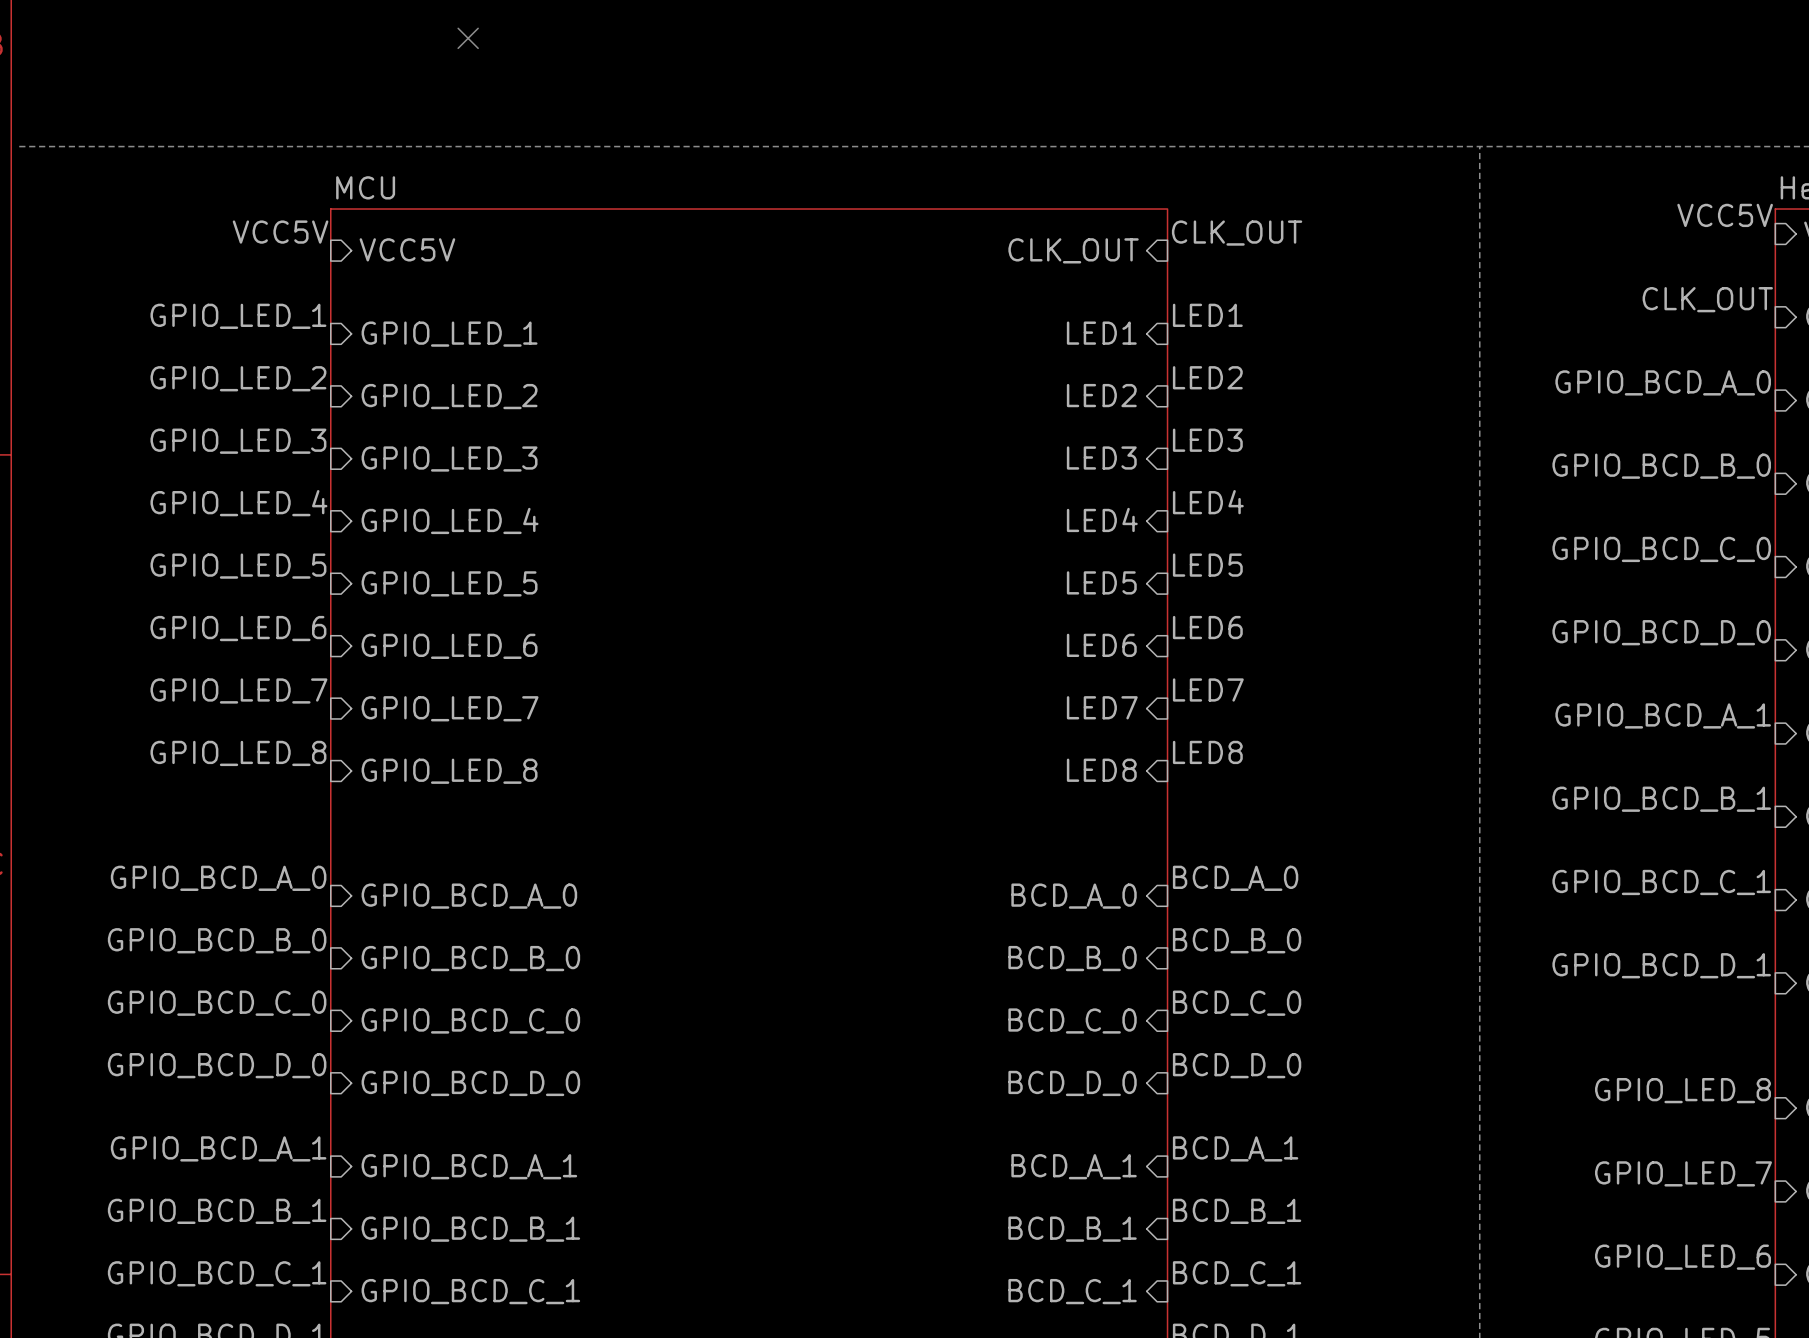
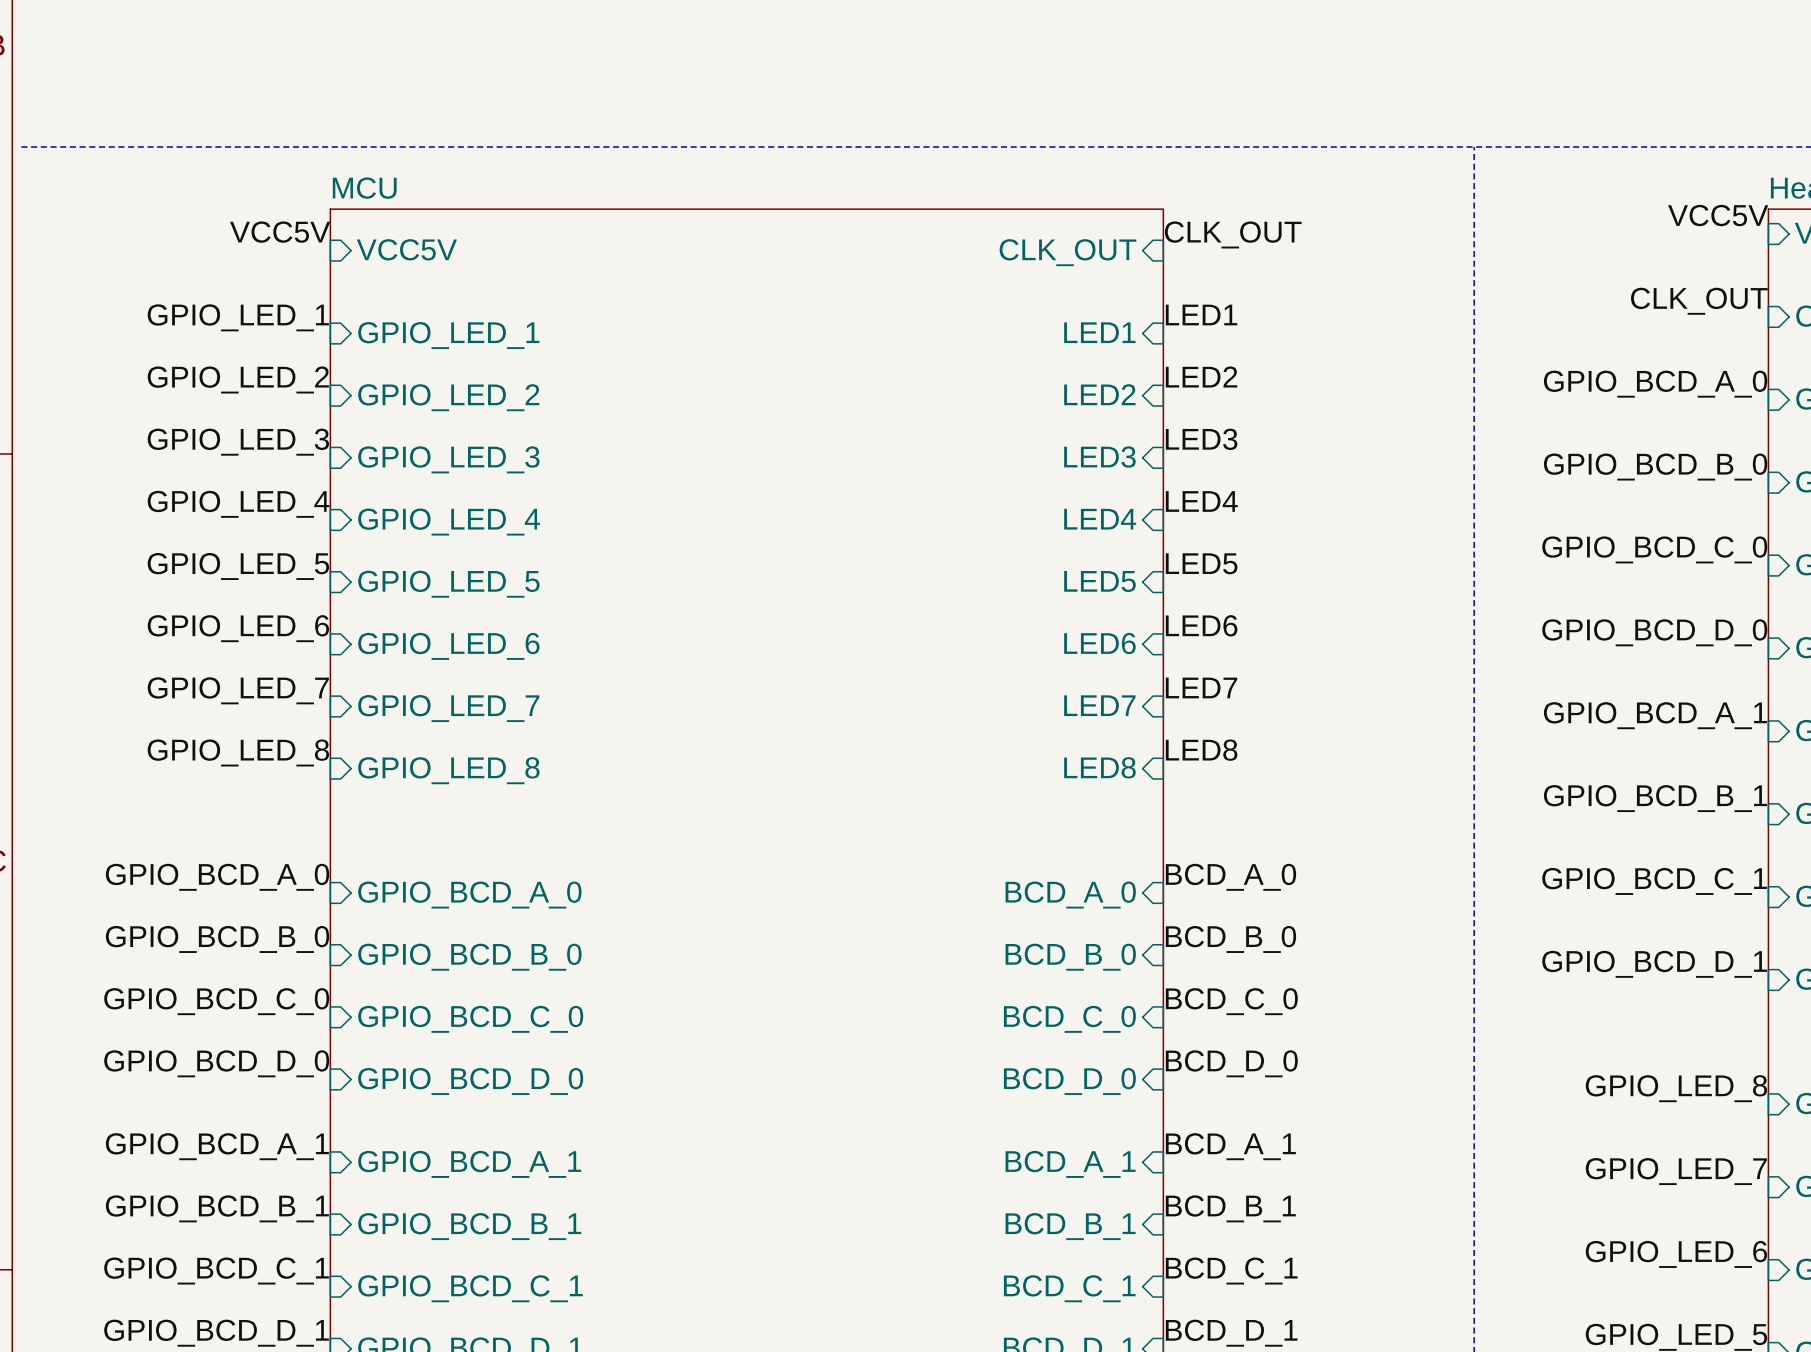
no-connect mark: (468, 38) -> none

